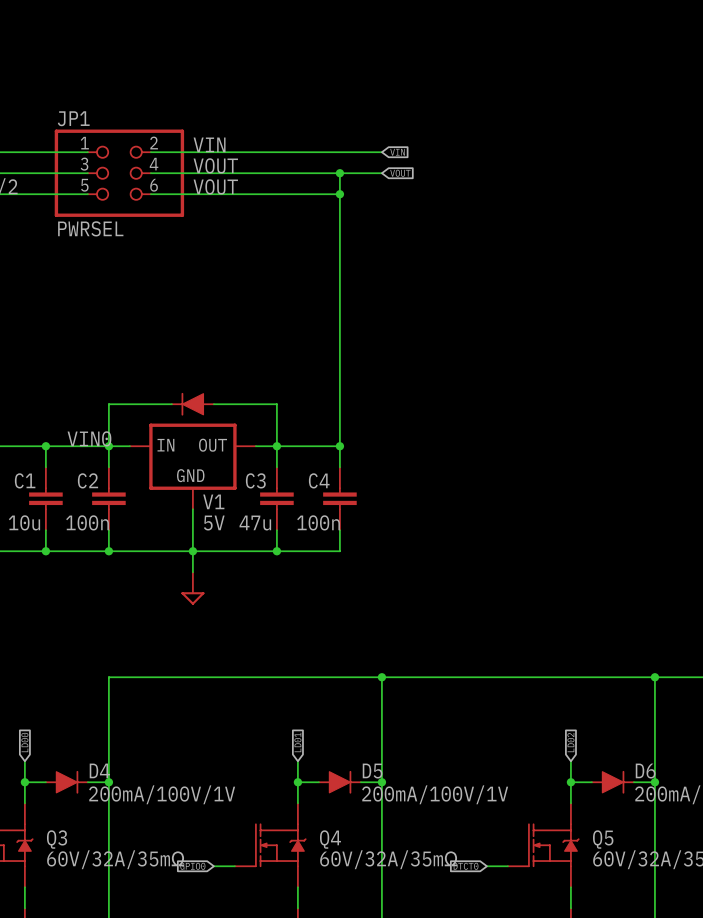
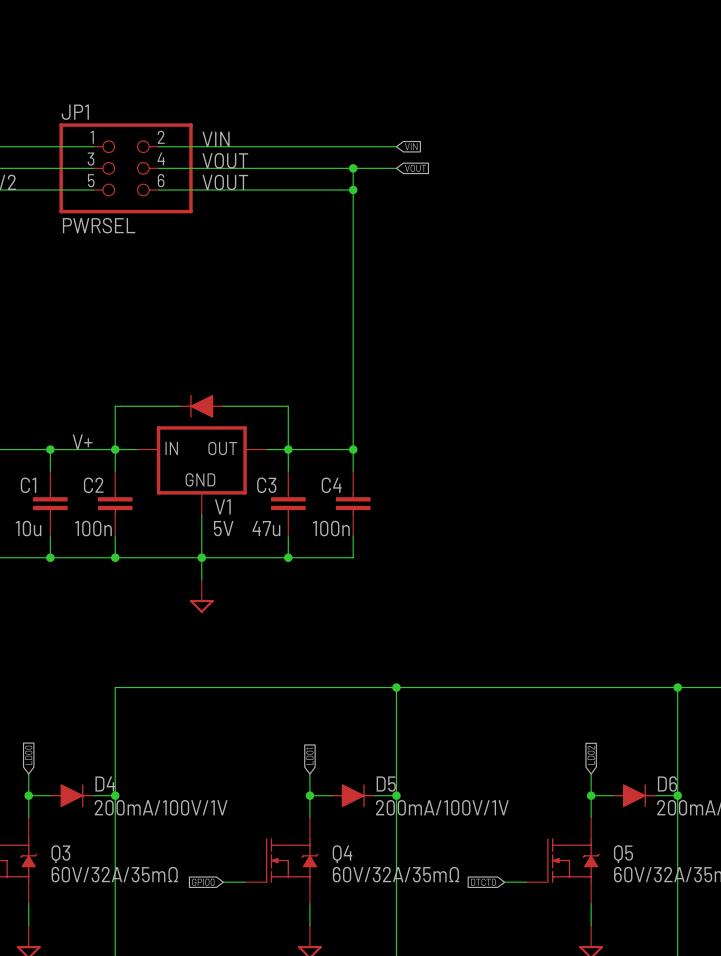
label: VIN0 (89, 438) -> V+ (82, 442)

